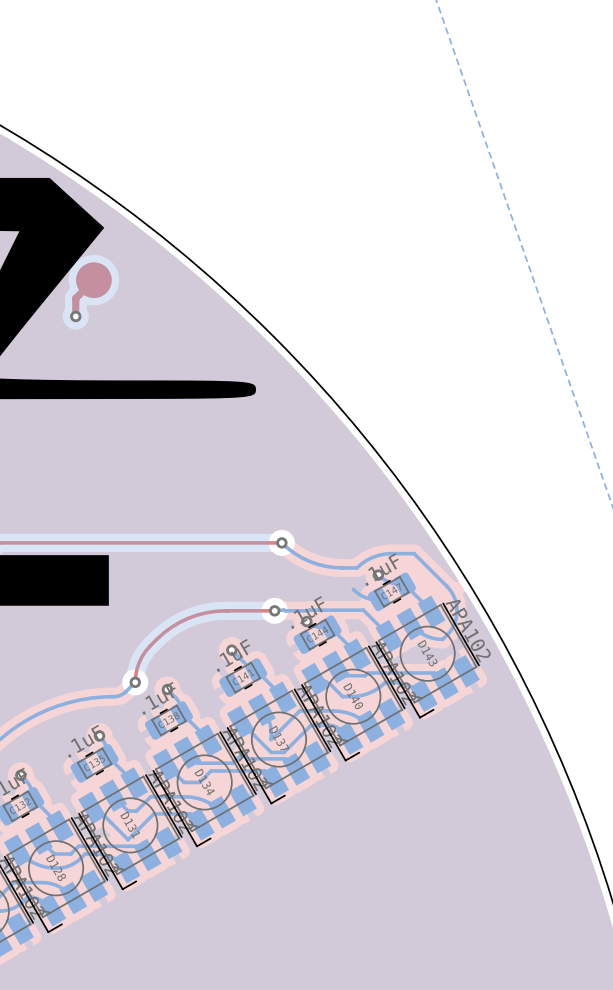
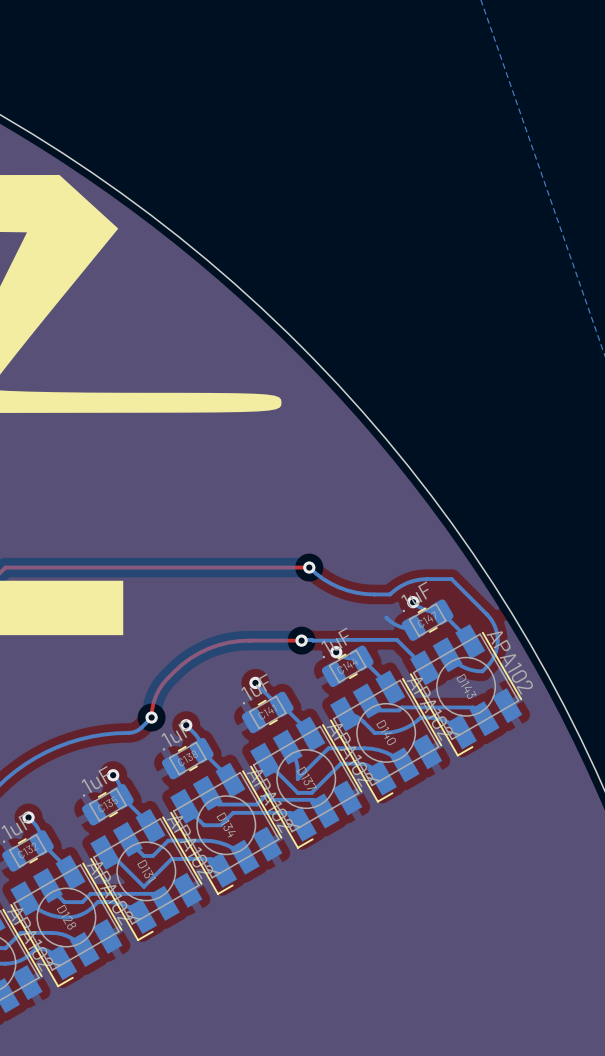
top track: (93, 280) (75, 298) (75, 316) -> none
part: (93, 280) -> none
via: (75, 316) -> none

